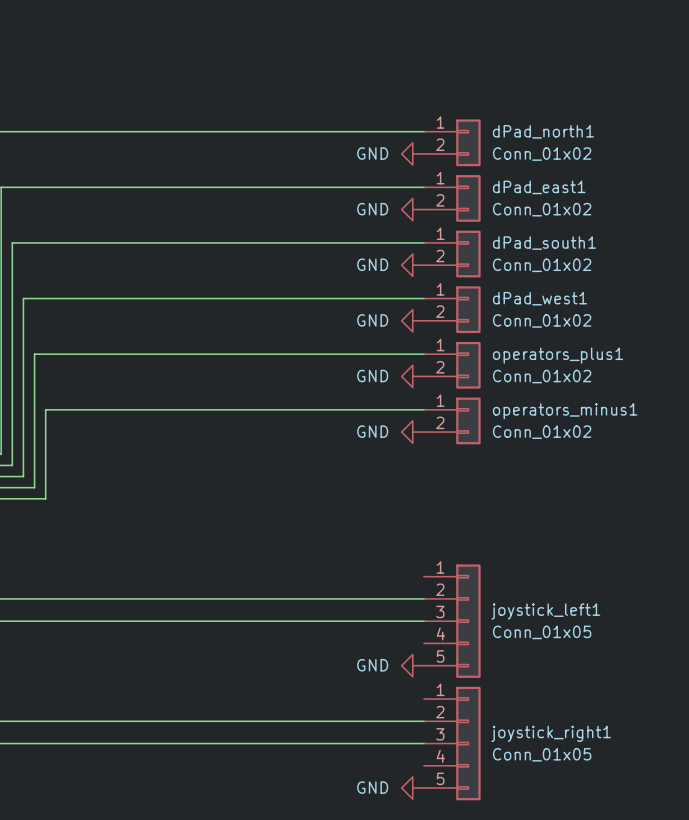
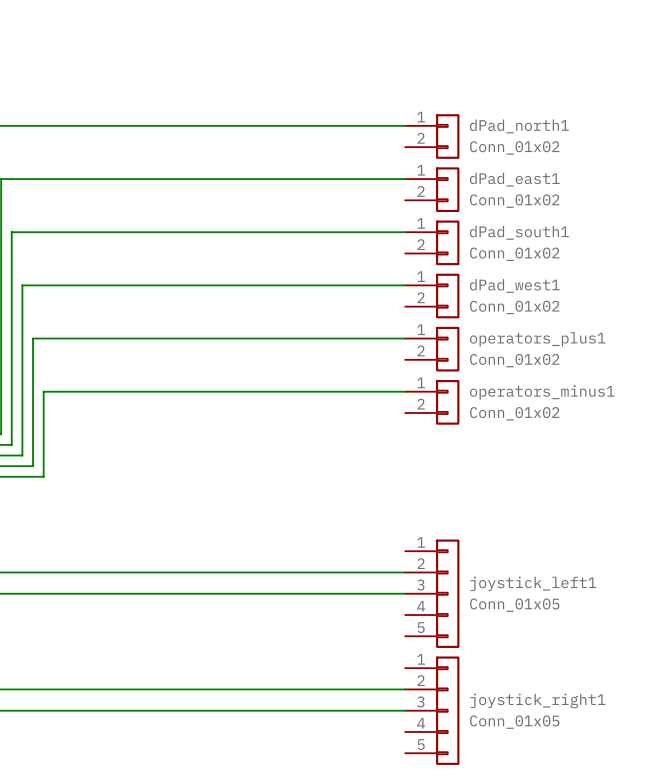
power symbol: GND (412, 153) -> none
power symbol: GND (412, 209) -> none
power symbol: GND (412, 265) -> none
power symbol: GND (412, 320) -> none
power symbol: GND (412, 376) -> none
power symbol: GND (412, 432) -> none
power symbol: GND (412, 665) -> none
power symbol: GND (412, 788) -> none

